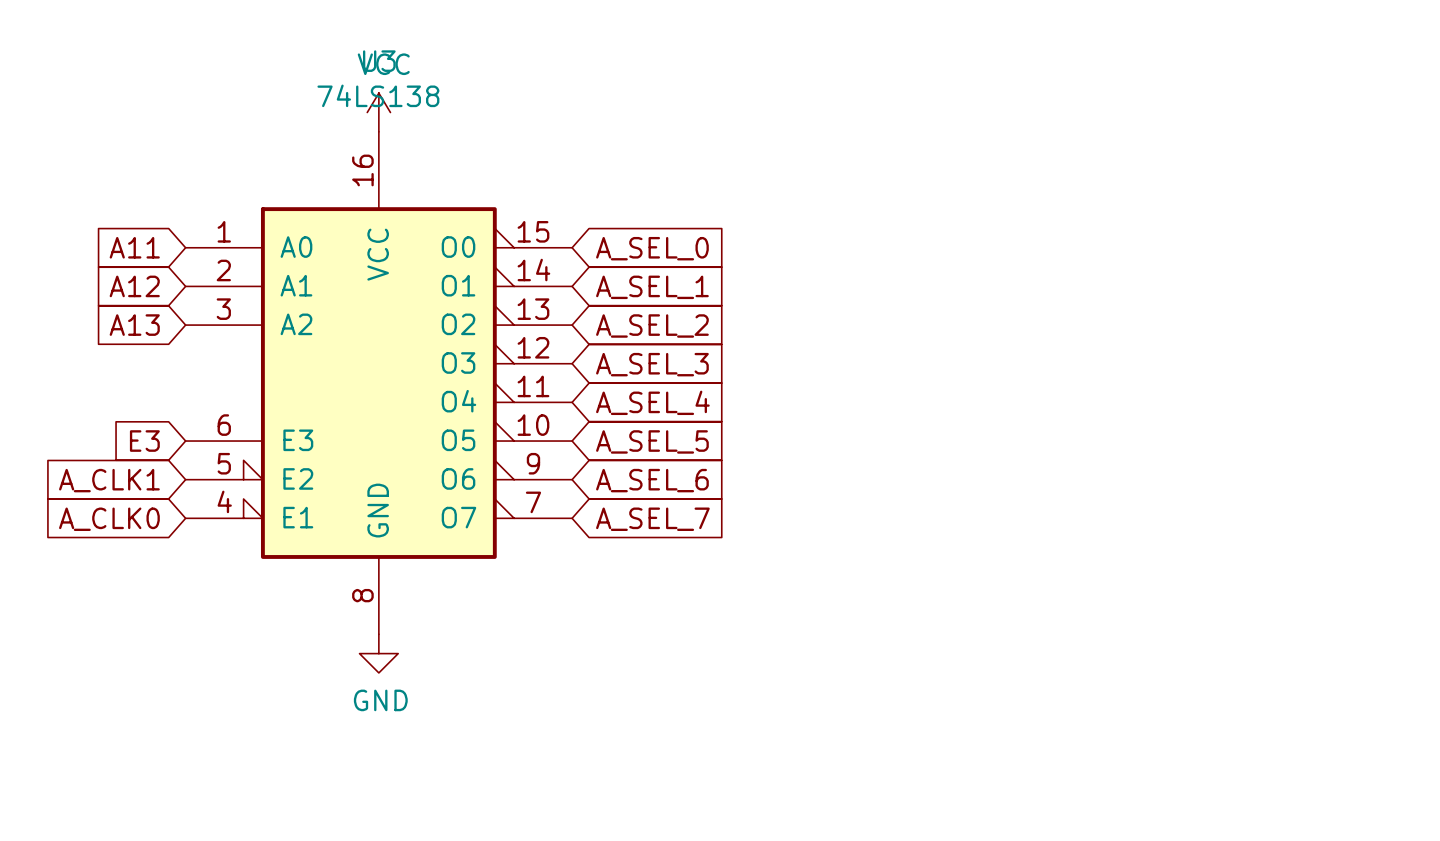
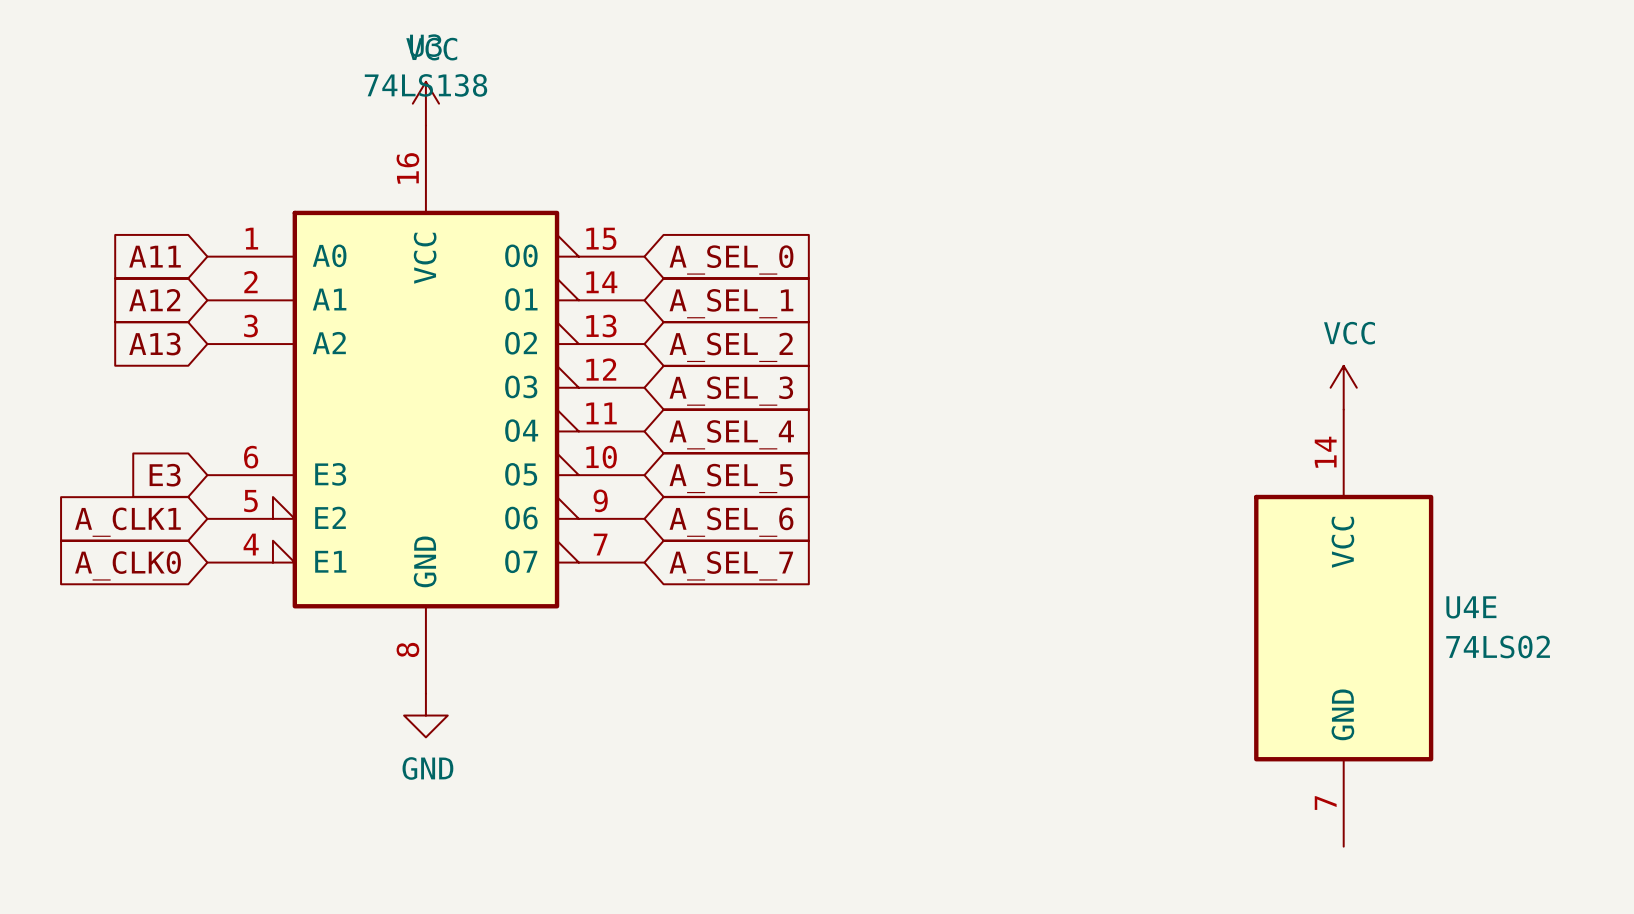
power symbol: none -> VCC (1343, 387)
U4E: none -> 74LS02 (1343, 628)

